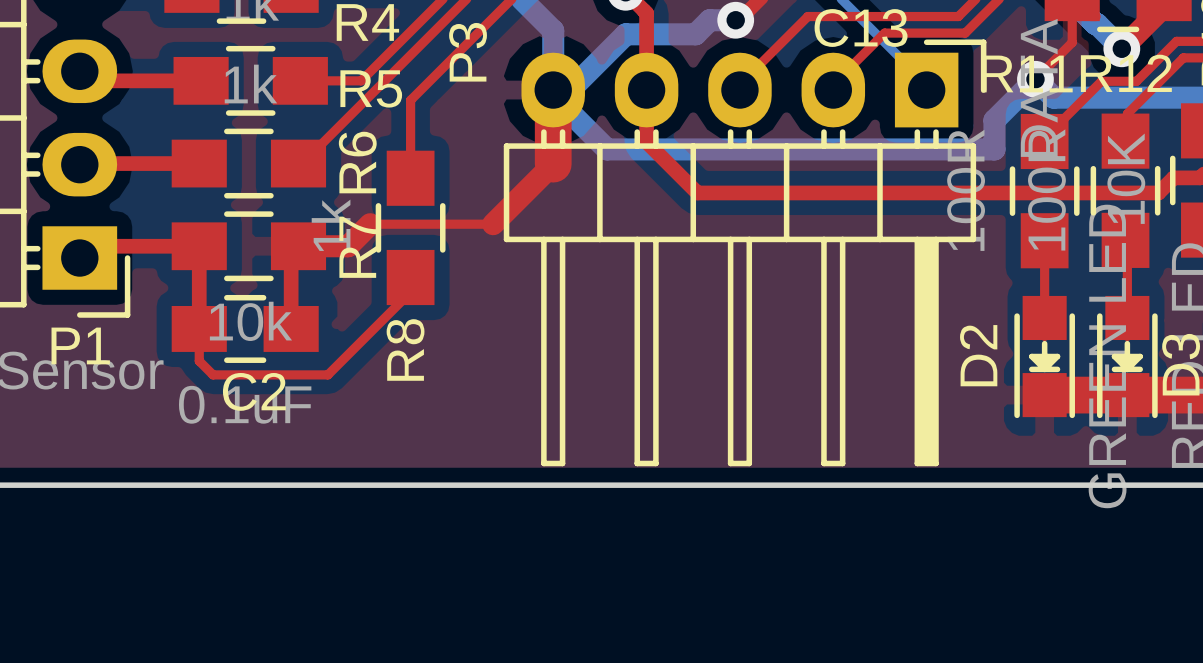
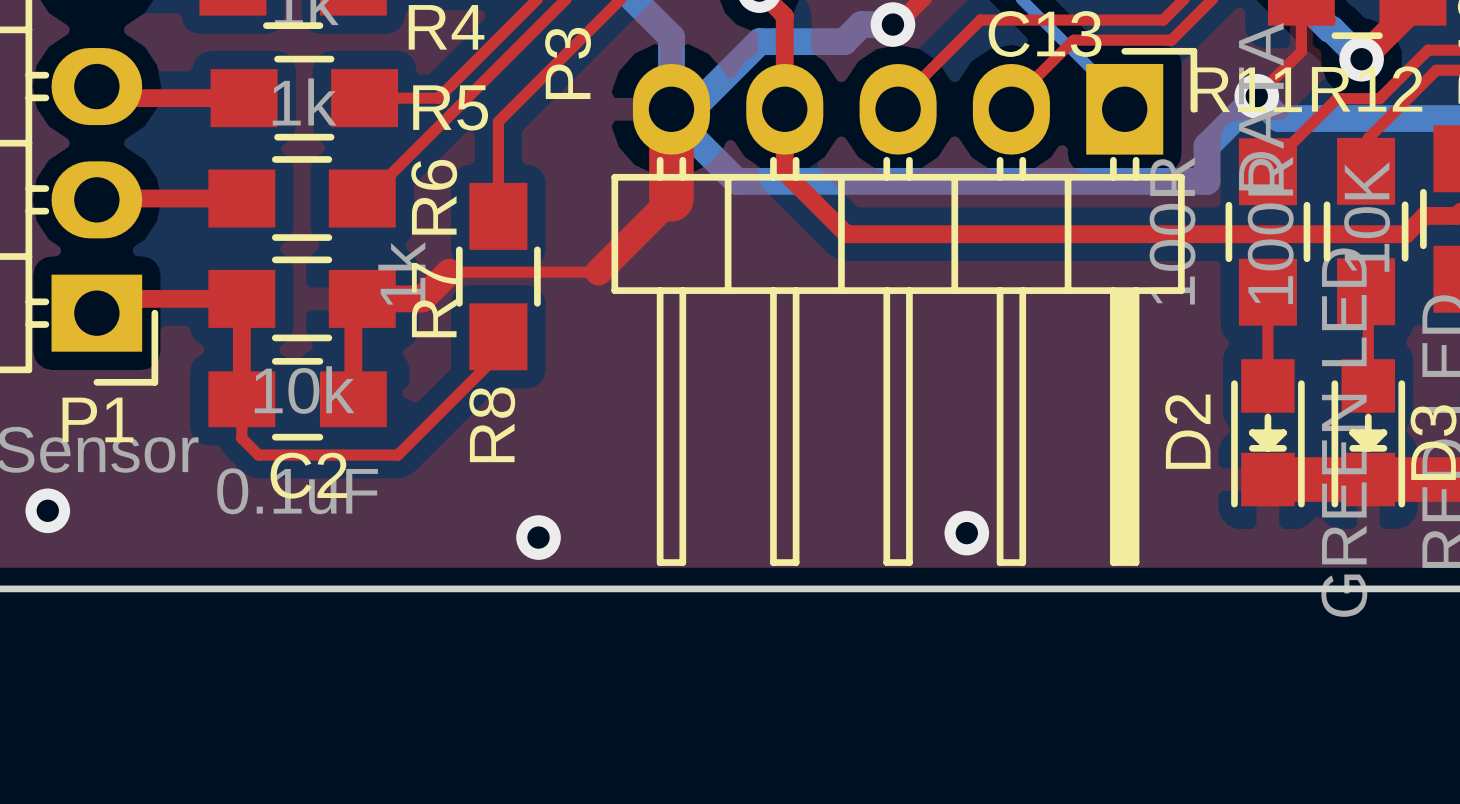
via: none -> (47, 510)
via: none -> (966, 533)
via: none -> (538, 537)

